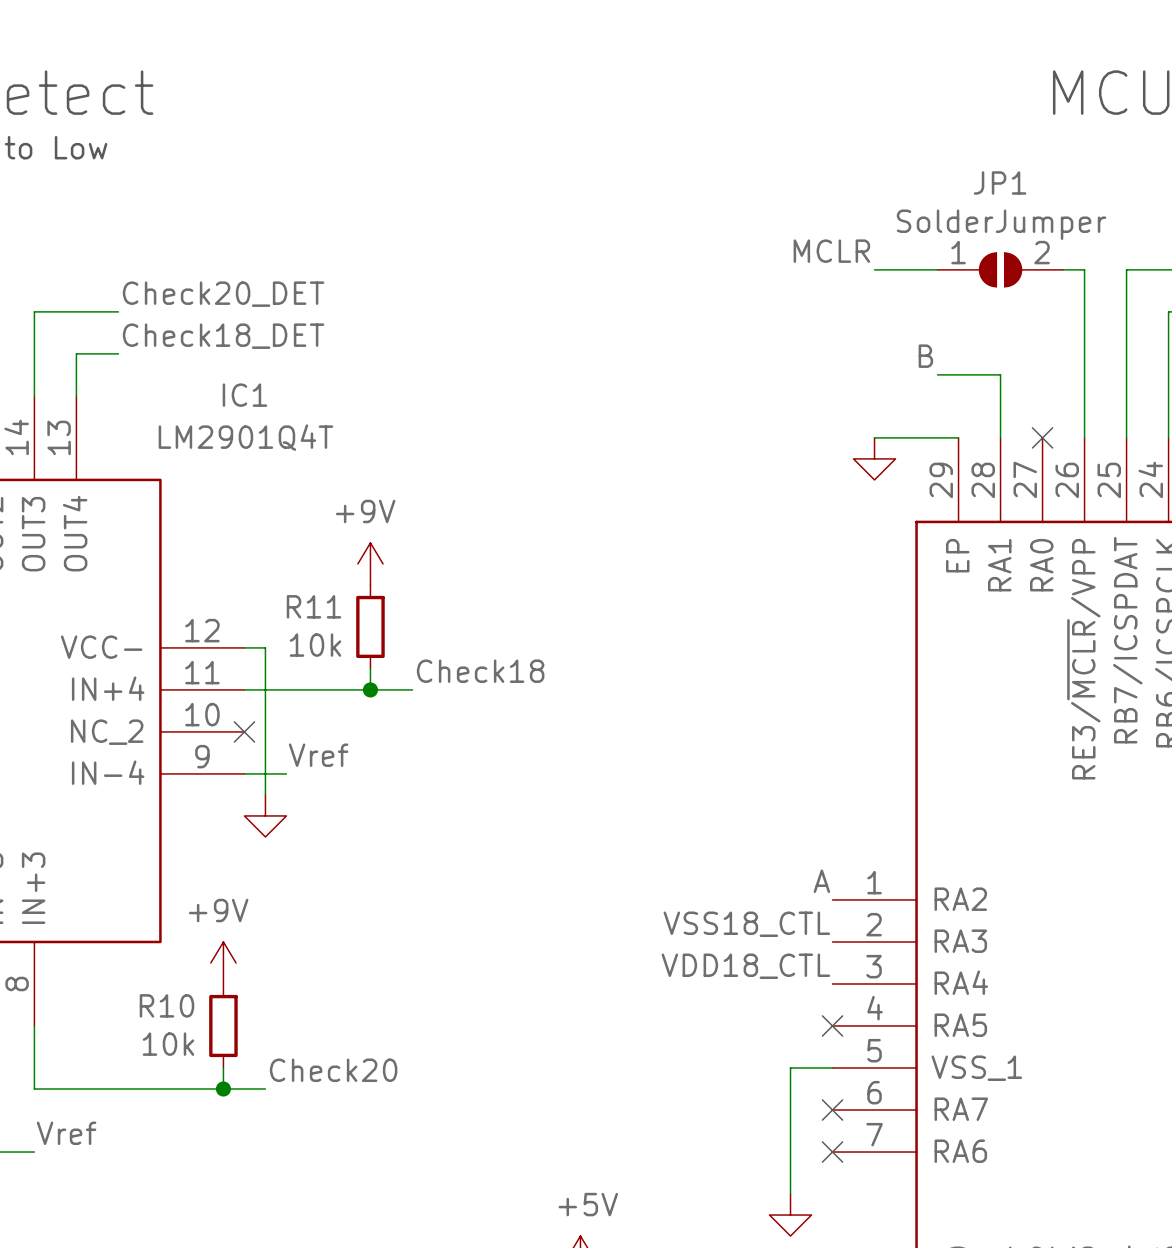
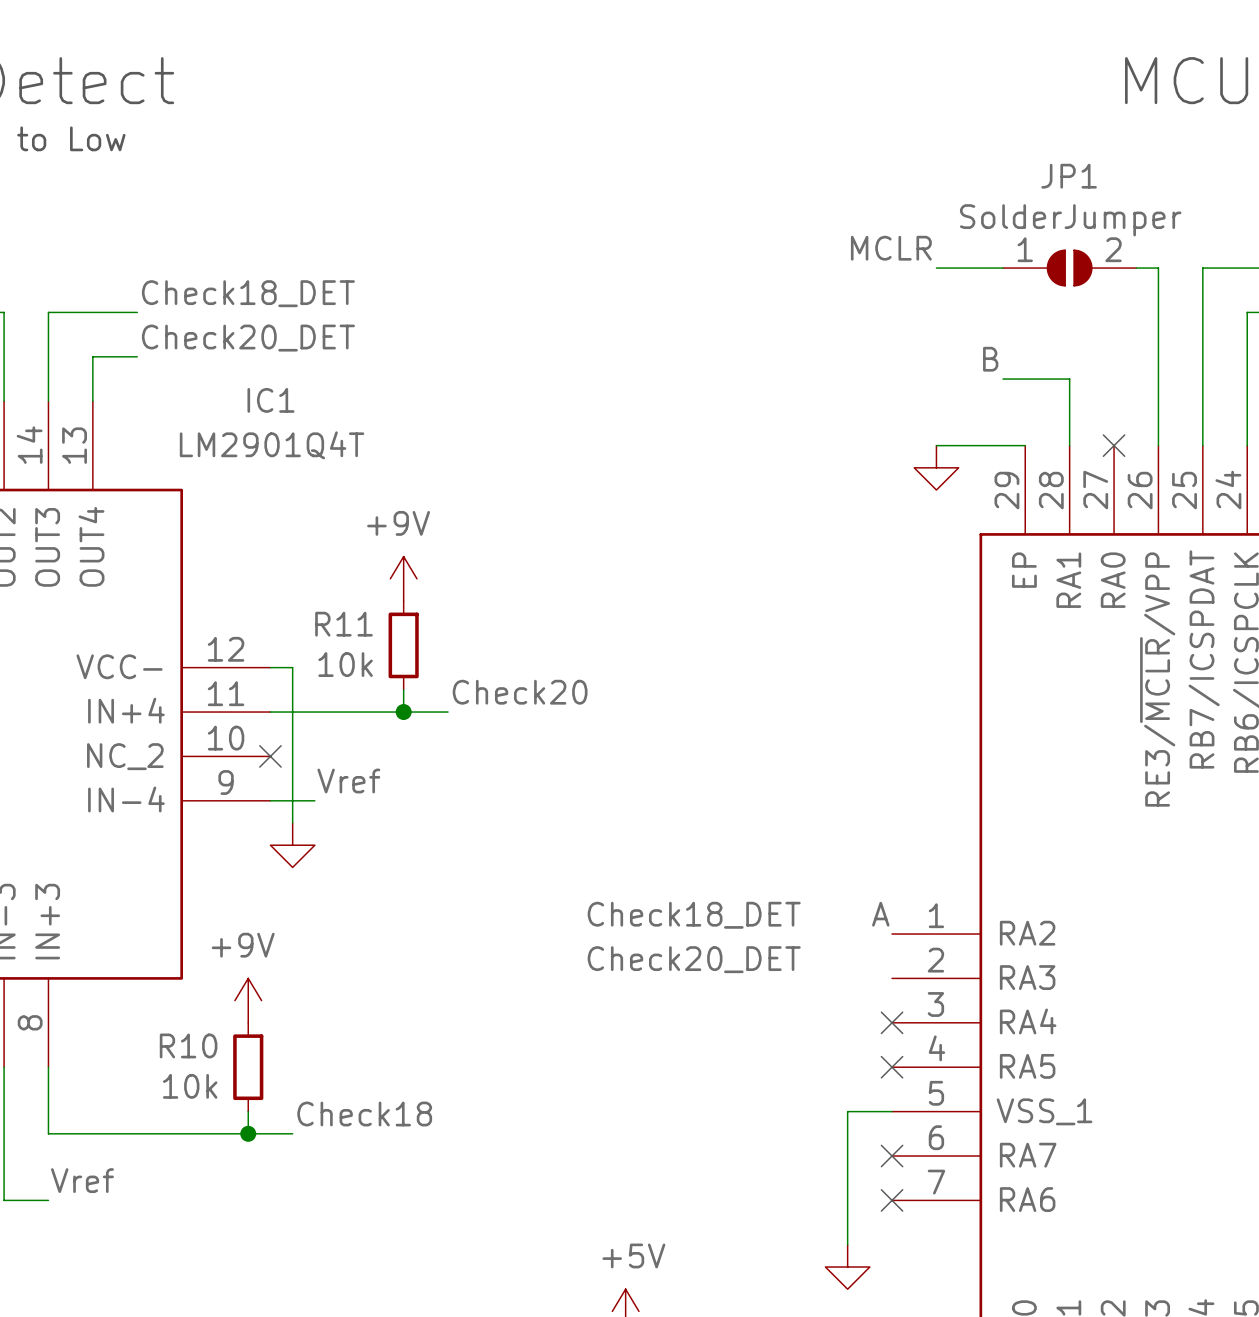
label: Check20_DET (223, 294) -> Check18_DET (248, 293)
label: Check18_DET (223, 336) -> Check20_DET (248, 338)
label: Check18 (480, 671) -> Check20 (520, 692)
label: none -> Check18_DET (694, 915)
label: none -> Check20_DET (694, 959)
label: VSS18_CTL (746, 924) -> none
label: VDD18_CTL (745, 966) -> none
no-connect mark: none -> (892, 1022)
label: Check20 (333, 1070) -> Check18 (364, 1114)

